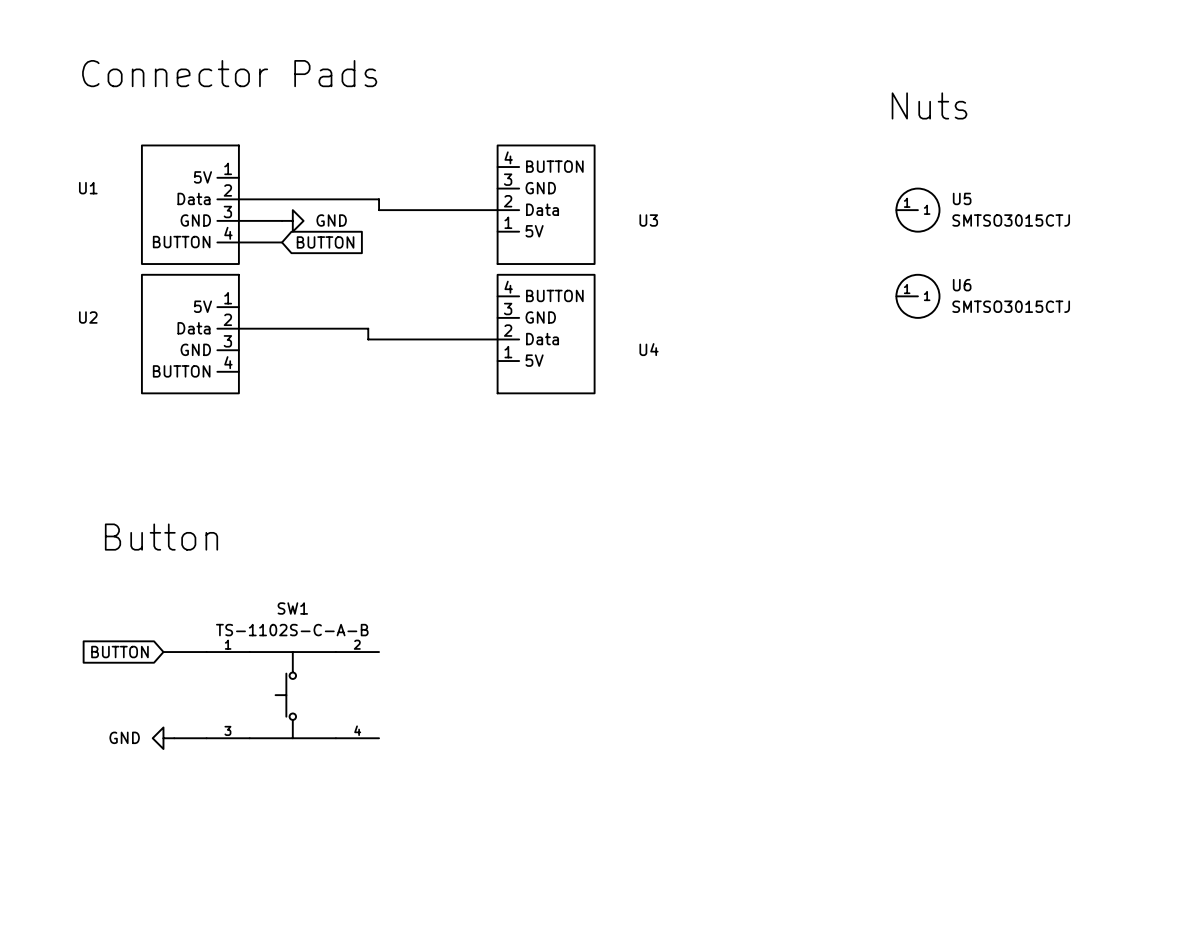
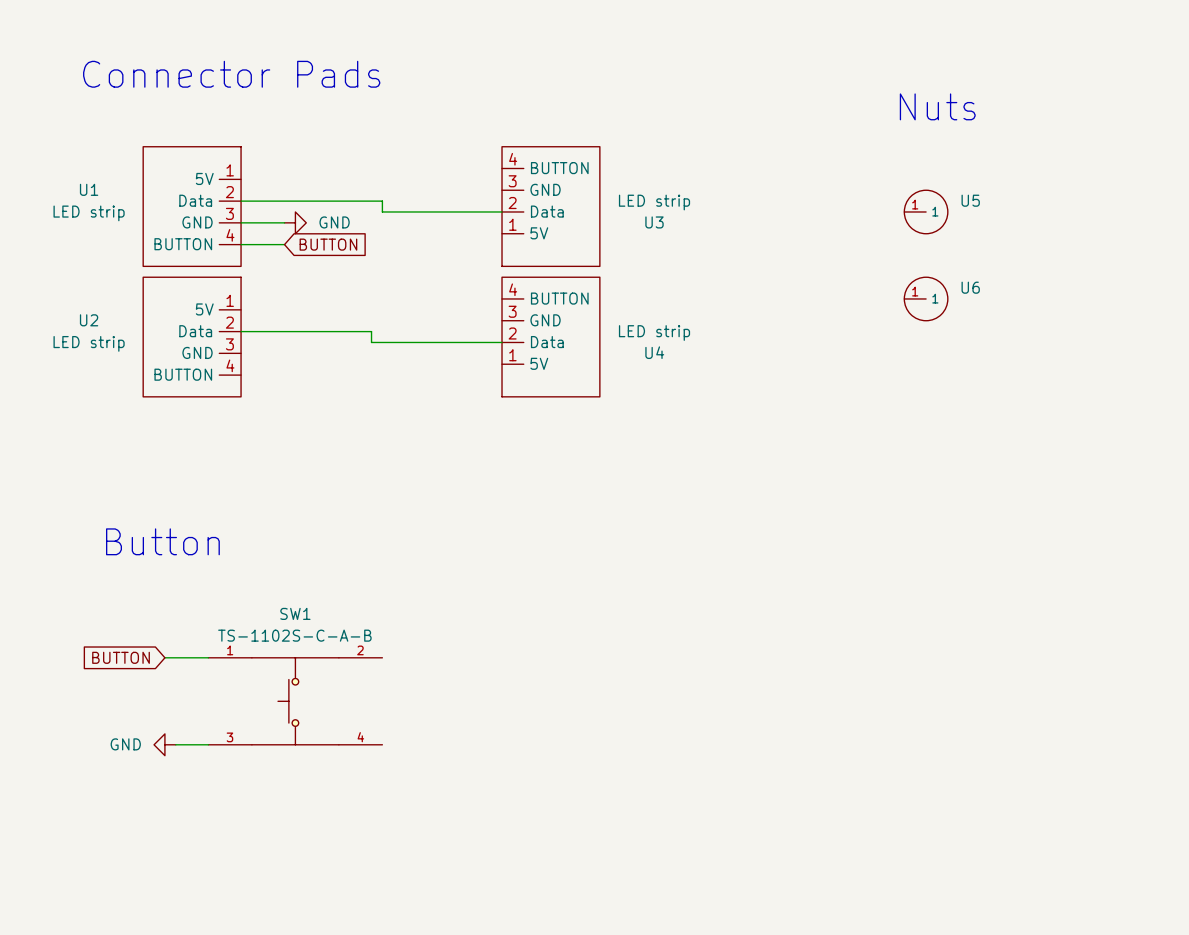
U3 value: none -> LED strip (654, 202)
U1 value: none -> LED strip (89, 213)
U5 value: SMTSO3015CTJ (1011, 220) -> none
U6 value: SMTSO3015CTJ (1011, 306) -> none
U4 value: none -> LED strip (654, 333)
U2 value: none -> LED strip (89, 343)

